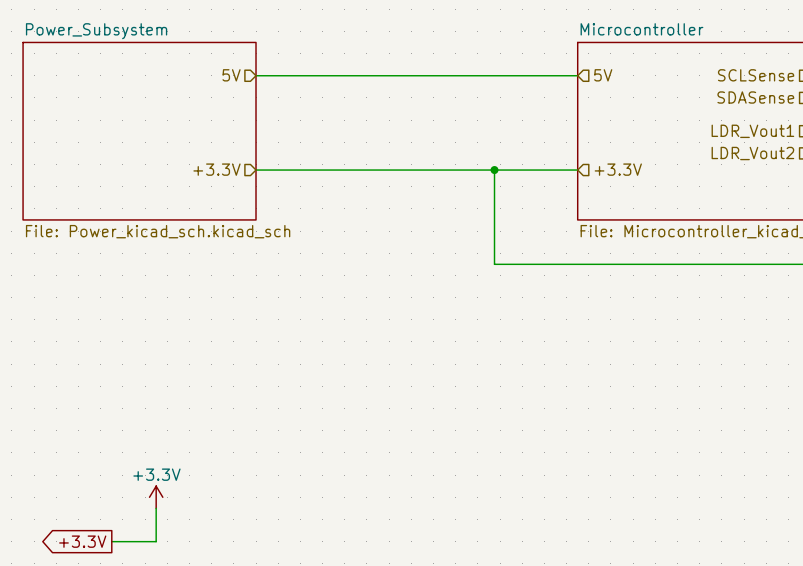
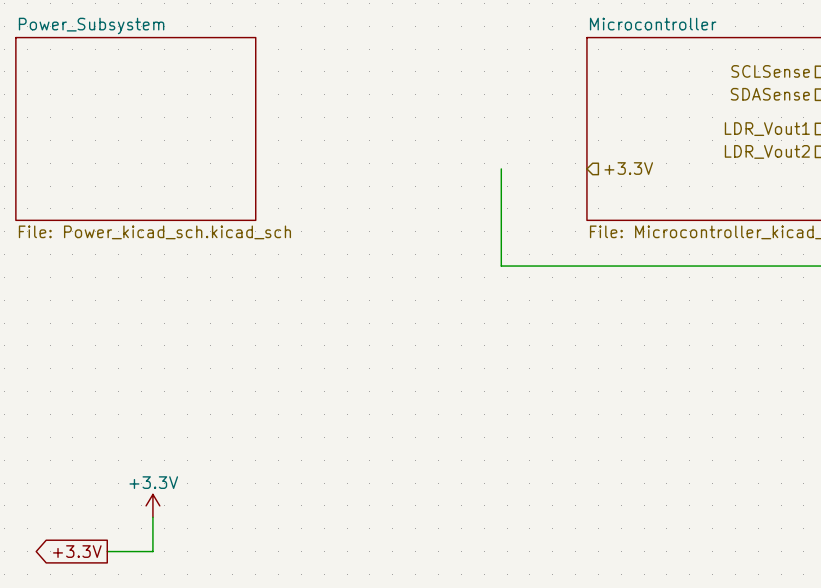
hierarchical label: 5V (231, 75) -> none
wire: (256, 75) (577, 75) -> none
hierarchical label: 5V (603, 75) -> none
hierarchical label: +3.3V (217, 169) -> none
wire: (256, 170) (577, 170) -> none
junction: (494, 170) -> none

